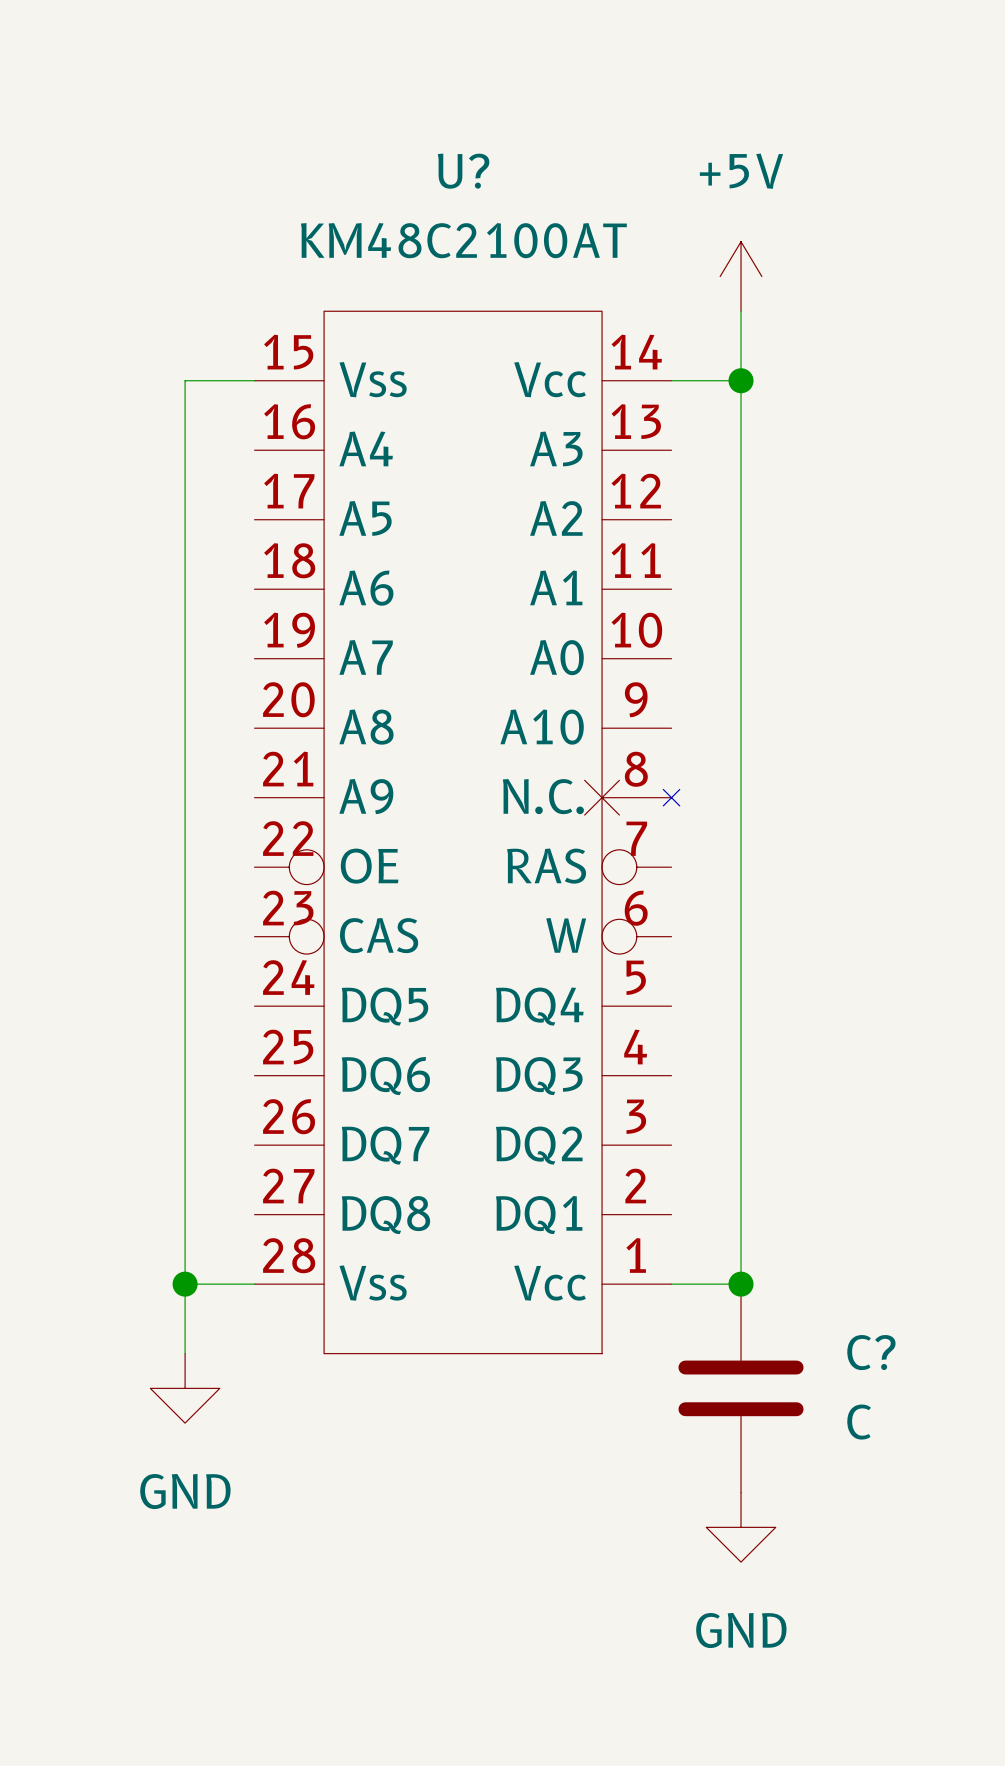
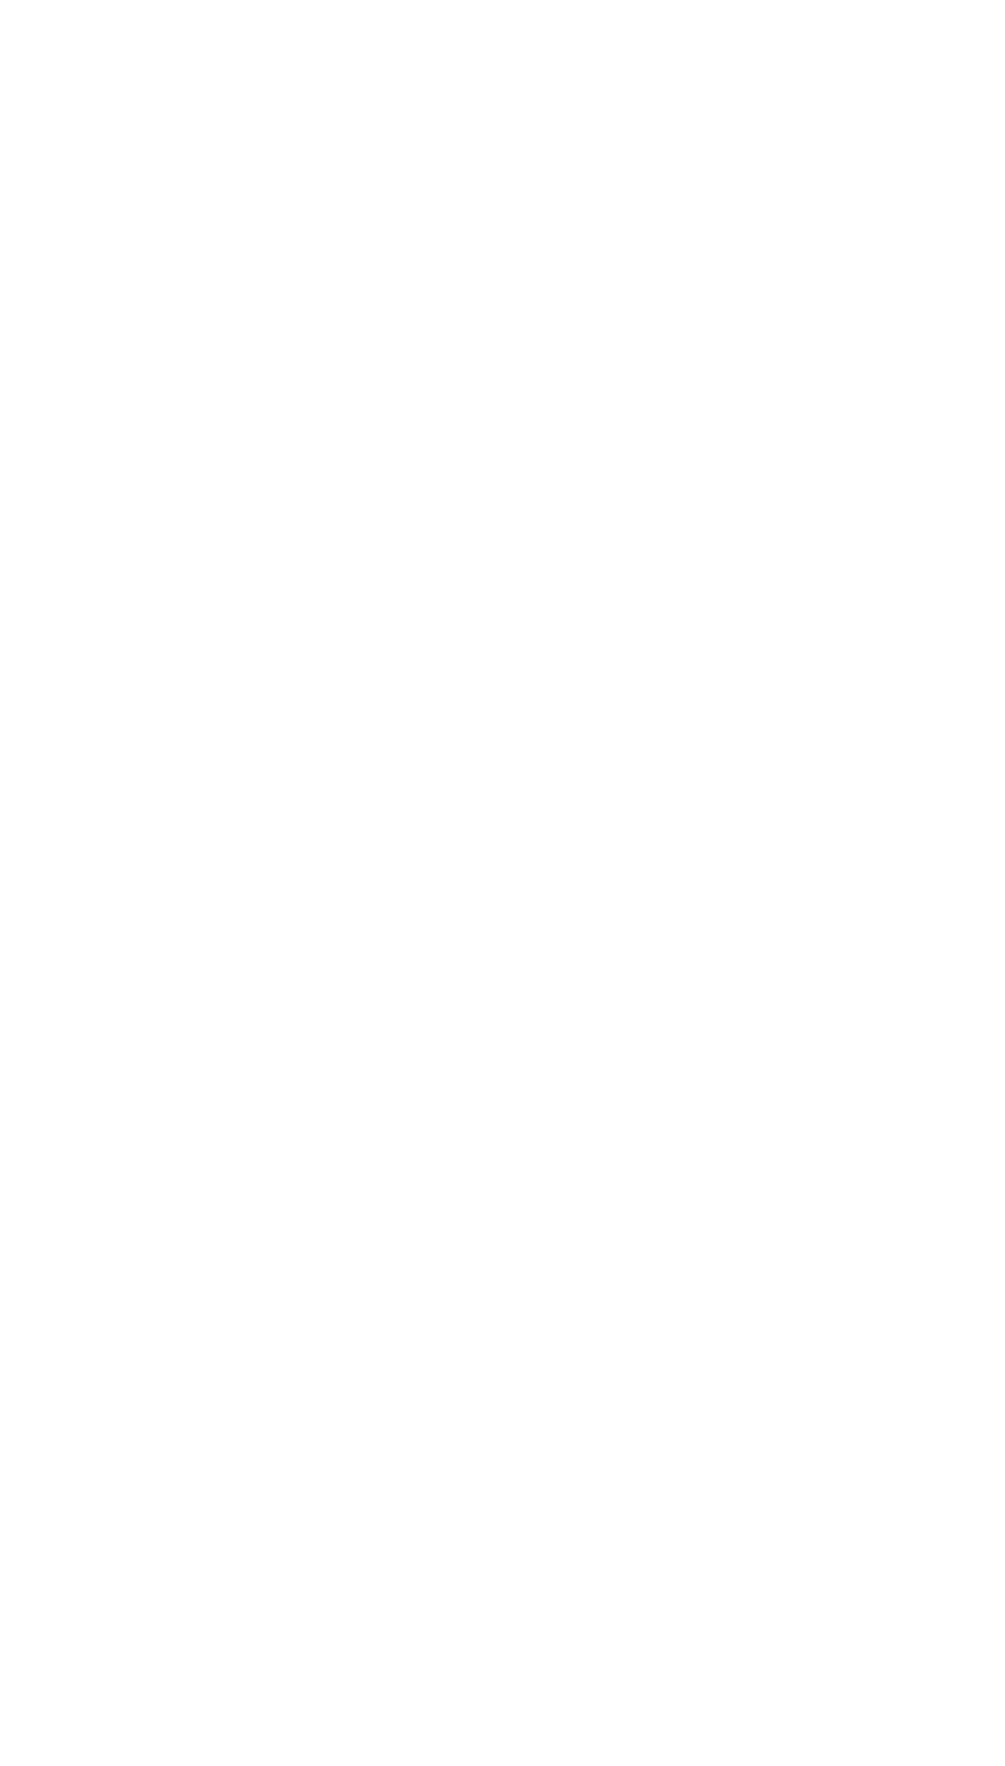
power symbol: +5V (741, 276) -> none
wire: (741, 311) (741, 1284) (671, 1284) -> none
wire: (254, 380) (185, 380) (185, 1353) -> none
wire: (671, 380) (741, 380) -> none
junction: (741, 380) -> none
U?: KM48C2100AT (467, 832) -> none
wire: (185, 1284) (254, 1284) -> none
junction: (185, 1284) -> none
junction: (741, 1284) -> none
power symbol: GND (185, 1388) -> none
C?: C (741, 1388) -> none
power symbol: GND (741, 1527) -> none

